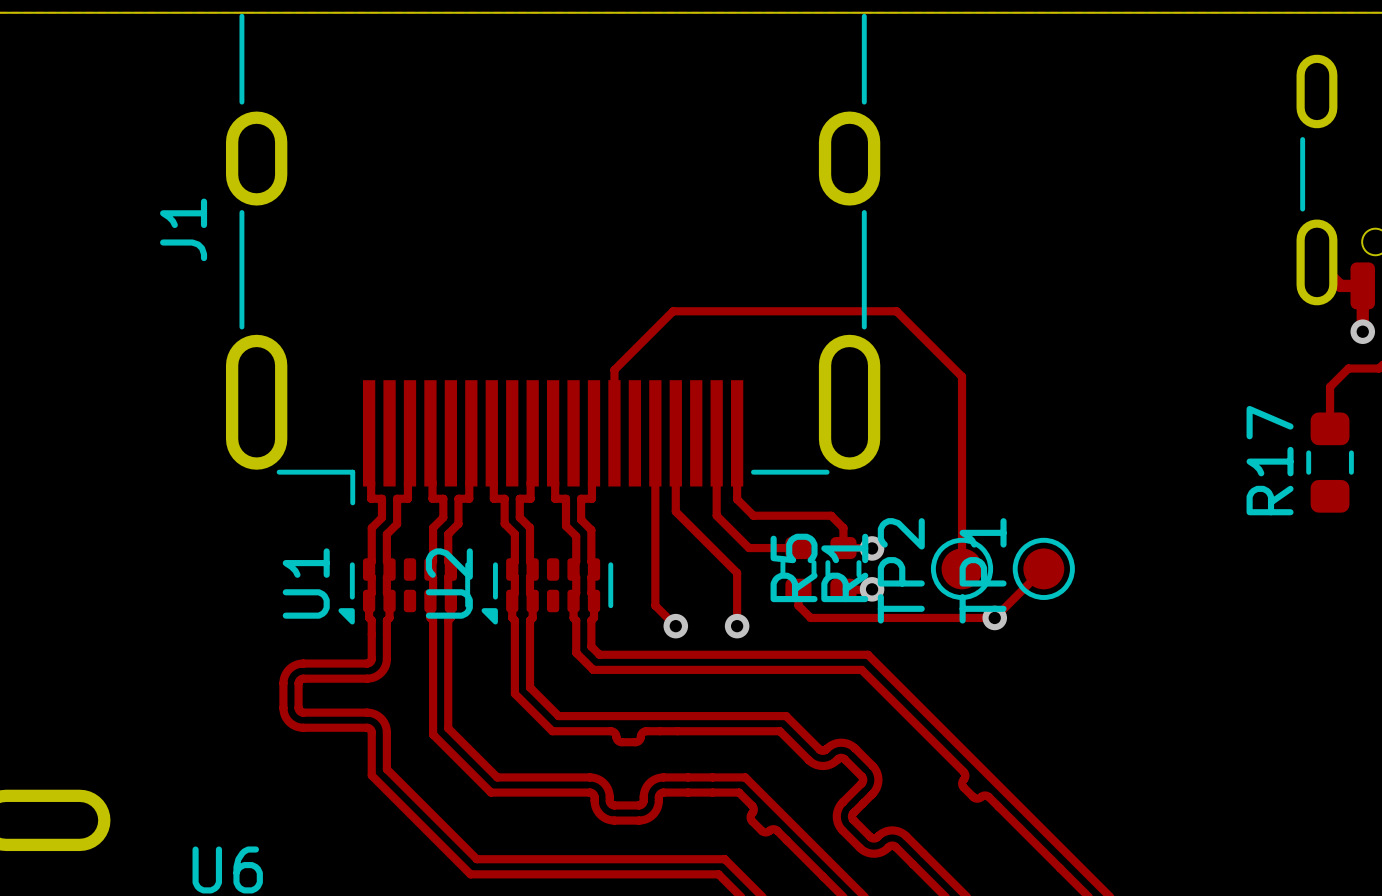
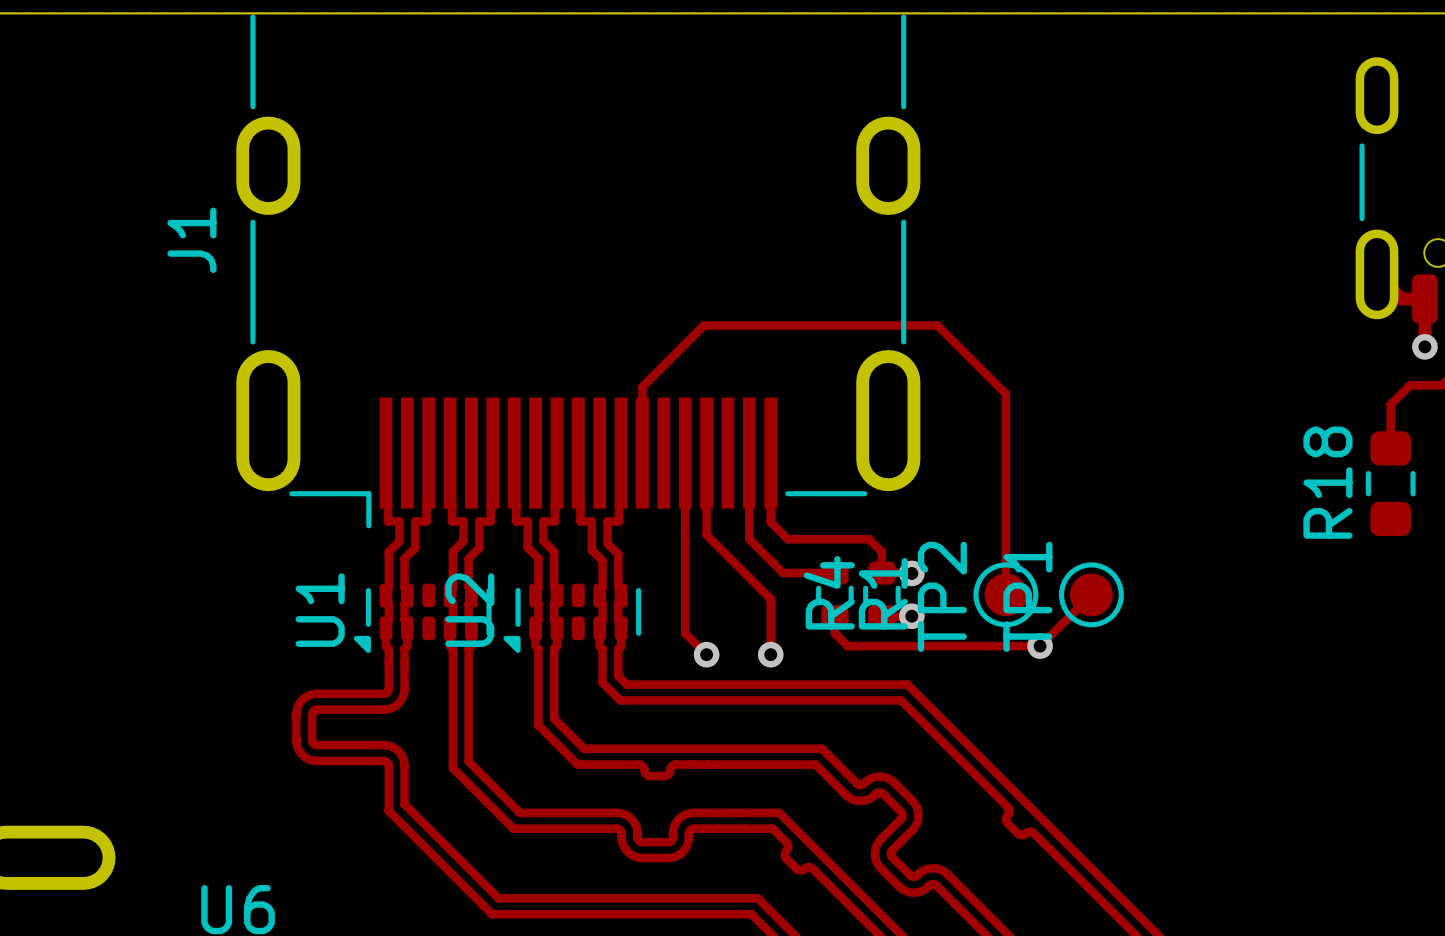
R17 name: R17 (1270, 460) -> R18 (1327, 482)
R5 name: R5 (794, 567) -> R4 (829, 592)

